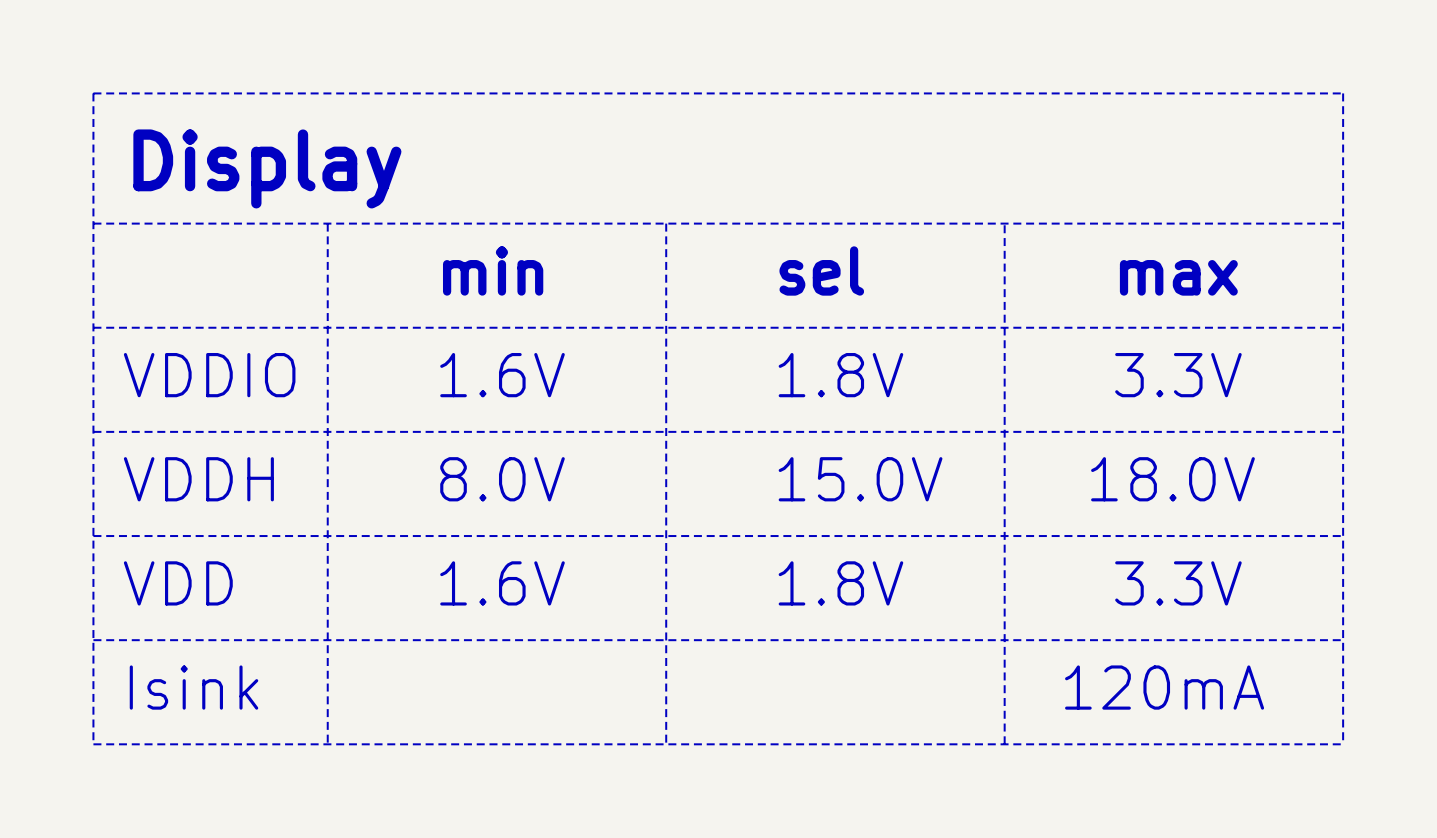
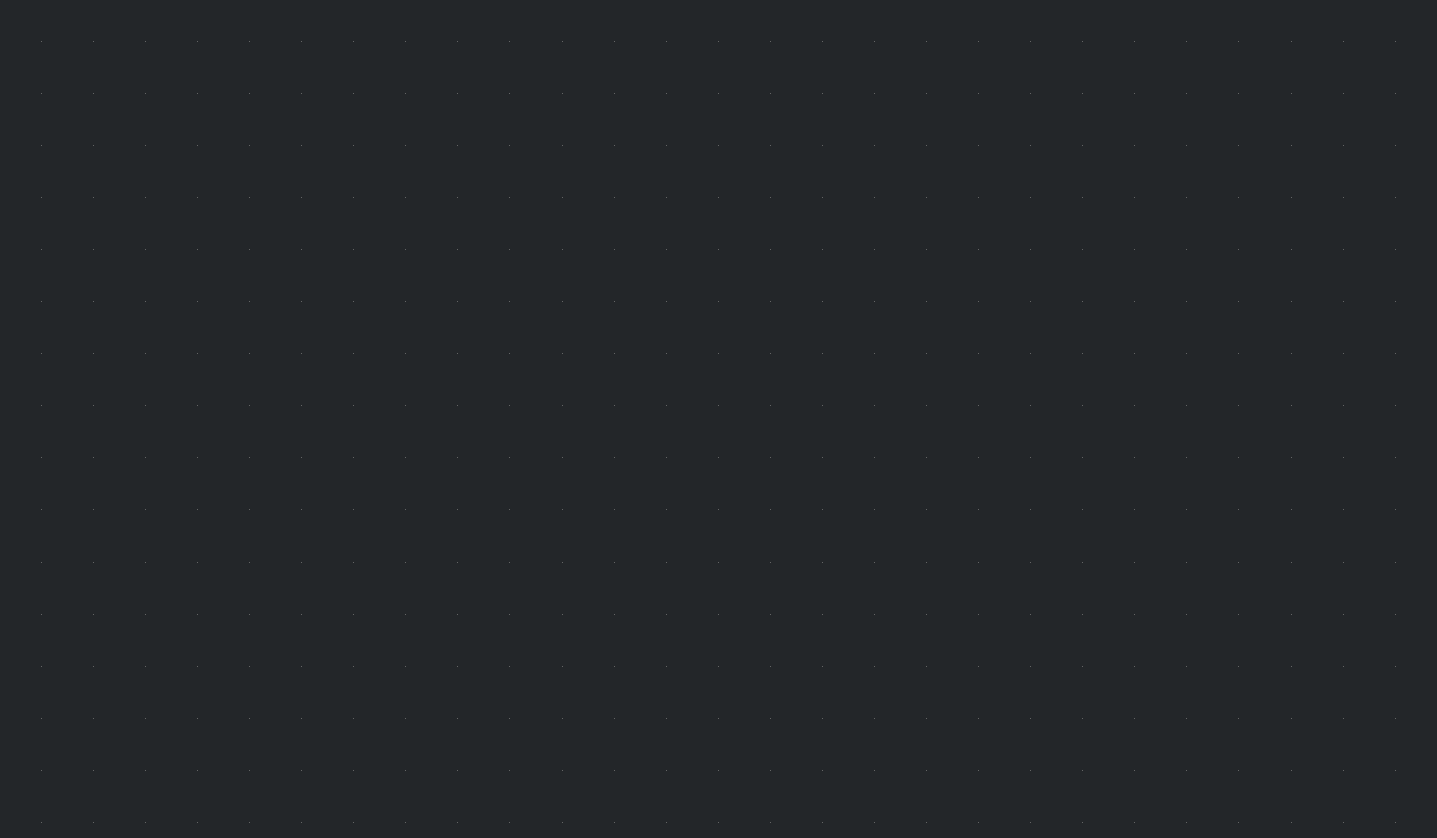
line: (93, 93) (1343, 93) (1343, 744) (93, 744) (93, 93) -> none
text: Display (267, 168) -> none
line: (93, 223) (1343, 223) -> none
line: (327, 223) (327, 744) -> none
line: (666, 223) (666, 744) -> none
line: (1004, 223) (1004, 744) -> none
text: min (493, 270) -> none
text: sel (821, 270) -> none
text: max (1178, 277) -> none
line: (93, 327) (1343, 327) -> none
text: VDDIO (209, 375) -> none
text: 1.6V (502, 375) -> none
text: 1.8V (840, 375) -> none
text: 3.3V (1178, 375) -> none
line: (93, 431) (1343, 431) -> none
text: VDDH (198, 479) -> none
text: 8.0V (502, 479) -> none
text: 15.0V (860, 479) -> none
text: 18.0V (1172, 479) -> none
line: (93, 536) (1343, 536) -> none
text: VDD (178, 583) -> none
text: 1.6V (502, 583) -> none
text: 1.8V (840, 583) -> none
text: 3.3V (1178, 583) -> none
line: (93, 640) (1343, 640) -> none
text: Isink (193, 687) -> none
text: 120mA (1164, 687) -> none

